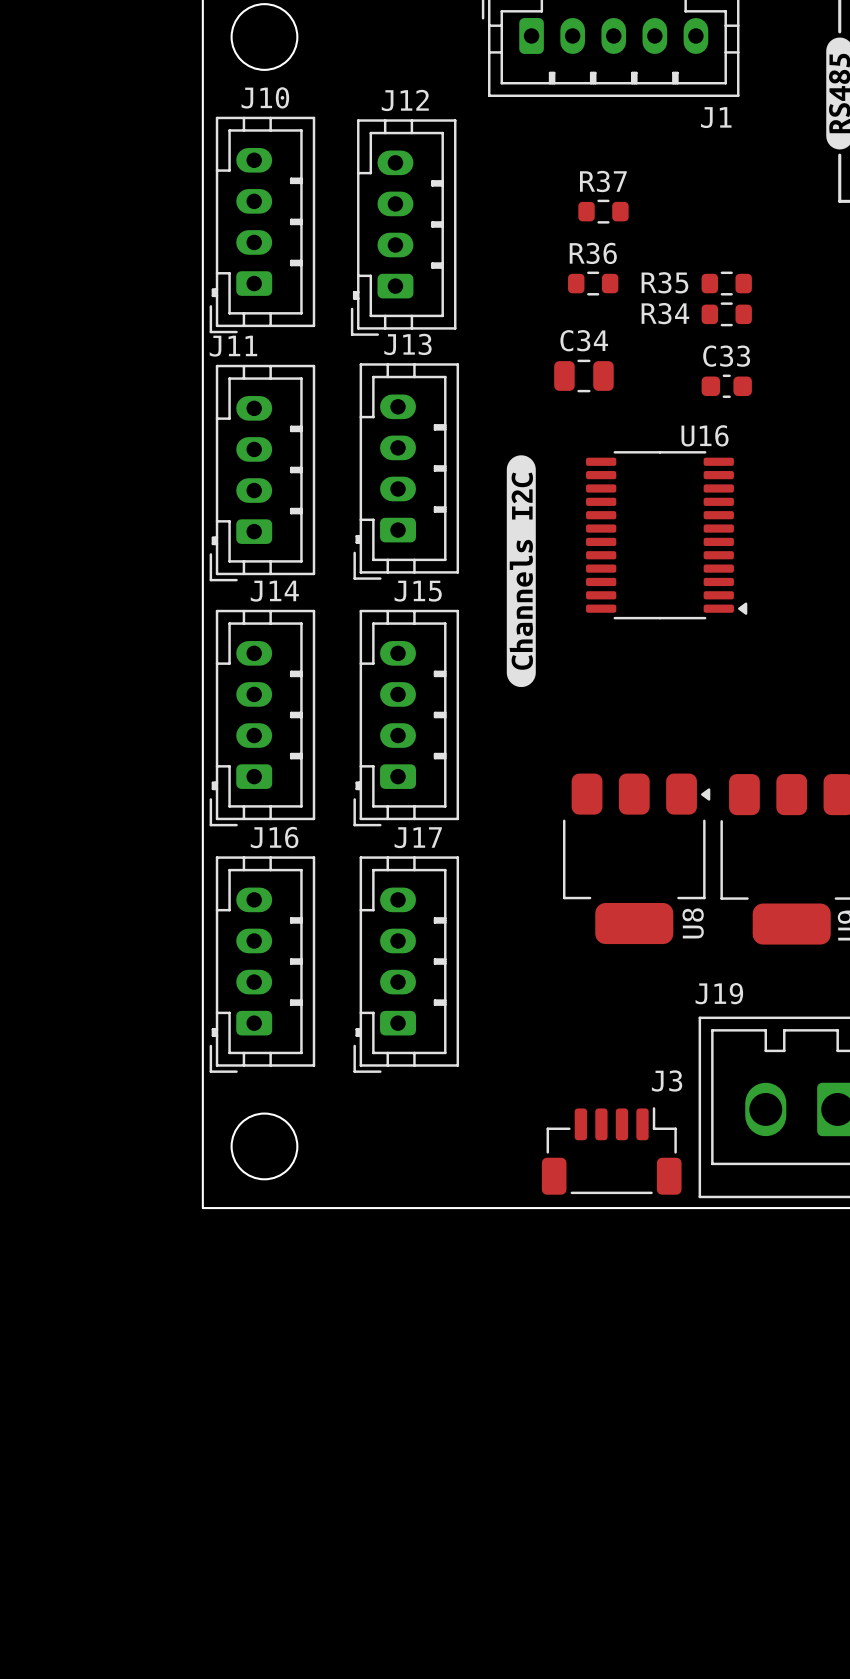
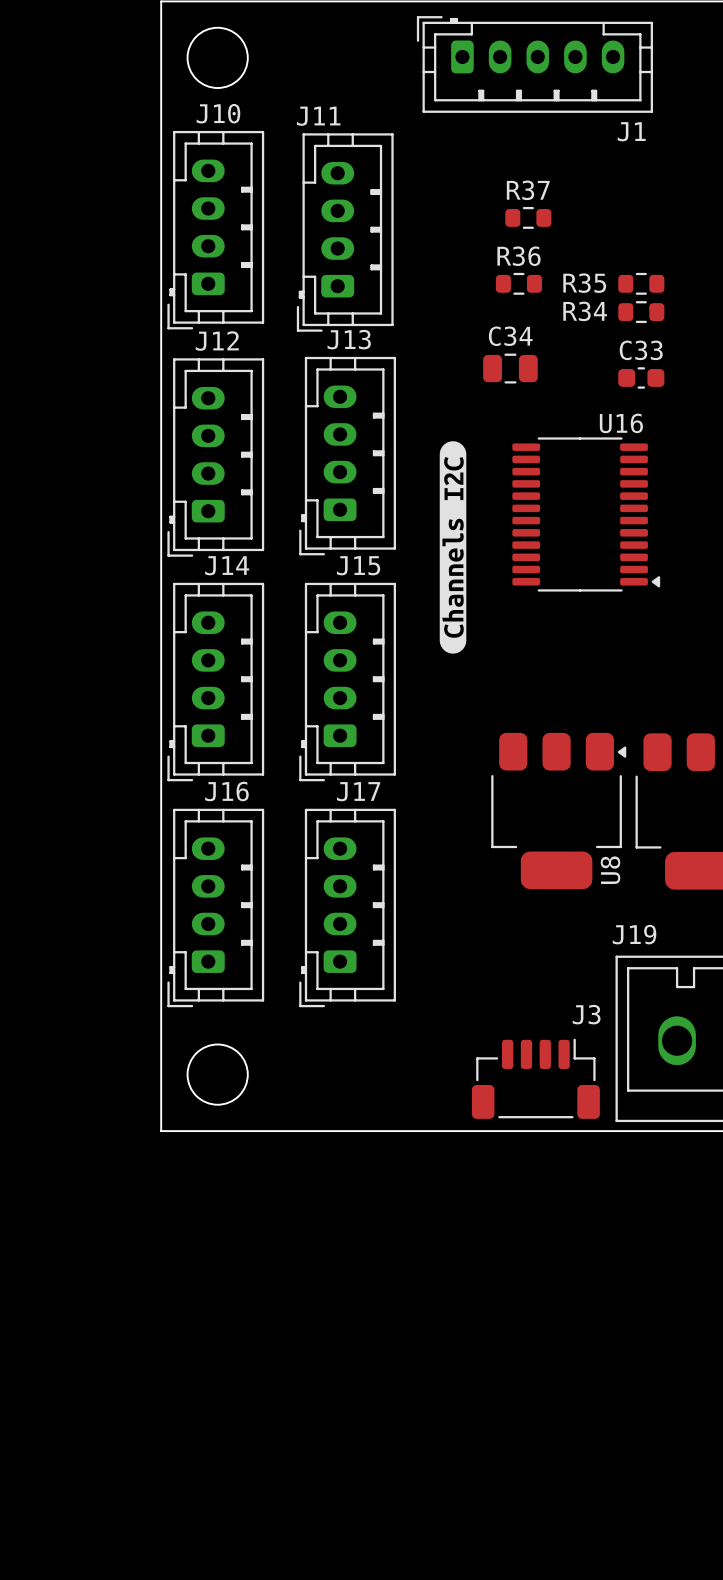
J12 name: J12 (405, 100) -> J11 (318, 116)
J11 name: J11 (233, 346) -> J12 (217, 341)

